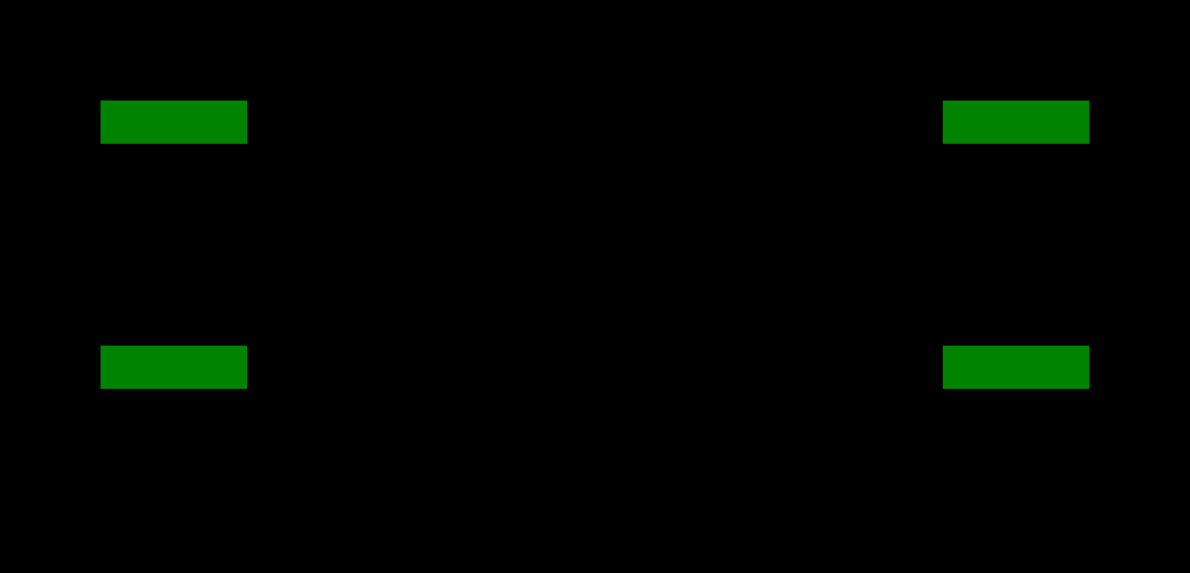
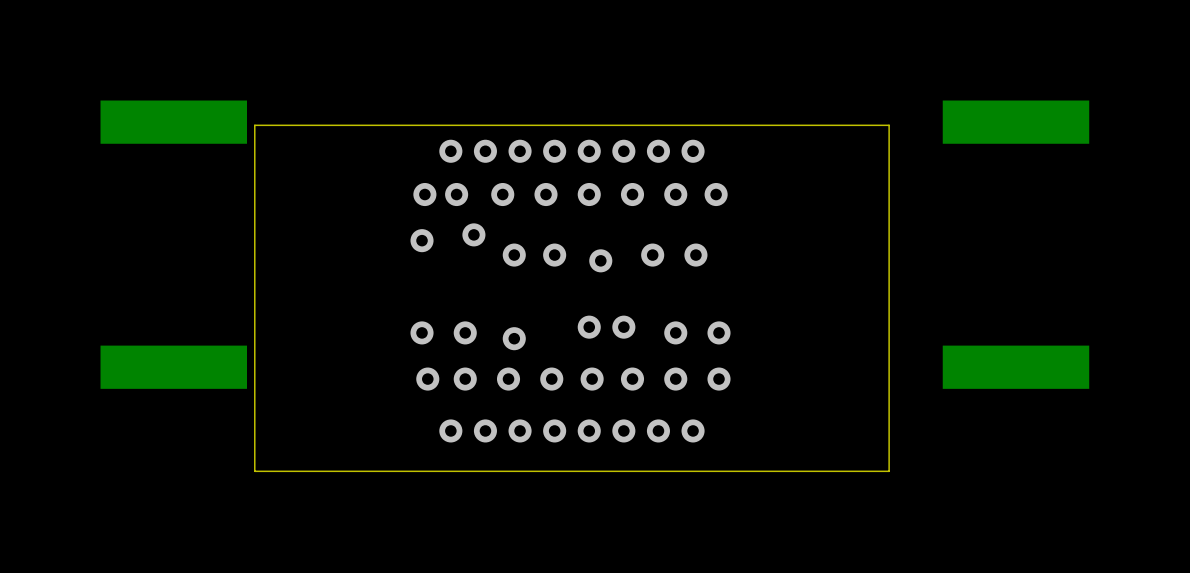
board edge: none -> (889, 125) (889, 471) (254, 471) (254, 125) (889, 125)
via: none -> (450, 151)
via: none -> (485, 151)
via: none -> (520, 151)
via: none -> (554, 151)
via: none -> (589, 151)
via: none -> (623, 151)
via: none -> (658, 151)
via: none -> (693, 151)
via: none -> (424, 194)
via: none -> (456, 194)
via: none -> (502, 194)
via: none -> (546, 194)
via: none -> (589, 194)
via: none -> (632, 194)
via: none -> (675, 194)
via: none -> (716, 194)
via: none -> (473, 234)
via: none -> (422, 240)
via: none -> (514, 255)
via: none -> (554, 255)
via: none -> (652, 255)
via: none -> (695, 255)
via: none -> (600, 260)
via: none -> (589, 327)
via: none -> (623, 327)
via: none -> (422, 332)
via: none -> (465, 332)
via: none -> (675, 332)
via: none -> (719, 332)
via: none -> (514, 338)
via: none -> (427, 379)
via: none -> (465, 379)
via: none -> (508, 379)
via: none -> (551, 379)
via: none -> (592, 379)
via: none -> (632, 379)
via: none -> (675, 379)
via: none -> (719, 379)
via: none -> (450, 430)
via: none -> (485, 430)
via: none -> (520, 430)
via: none -> (554, 430)
via: none -> (589, 430)
via: none -> (623, 430)
via: none -> (658, 430)
via: none -> (693, 430)

